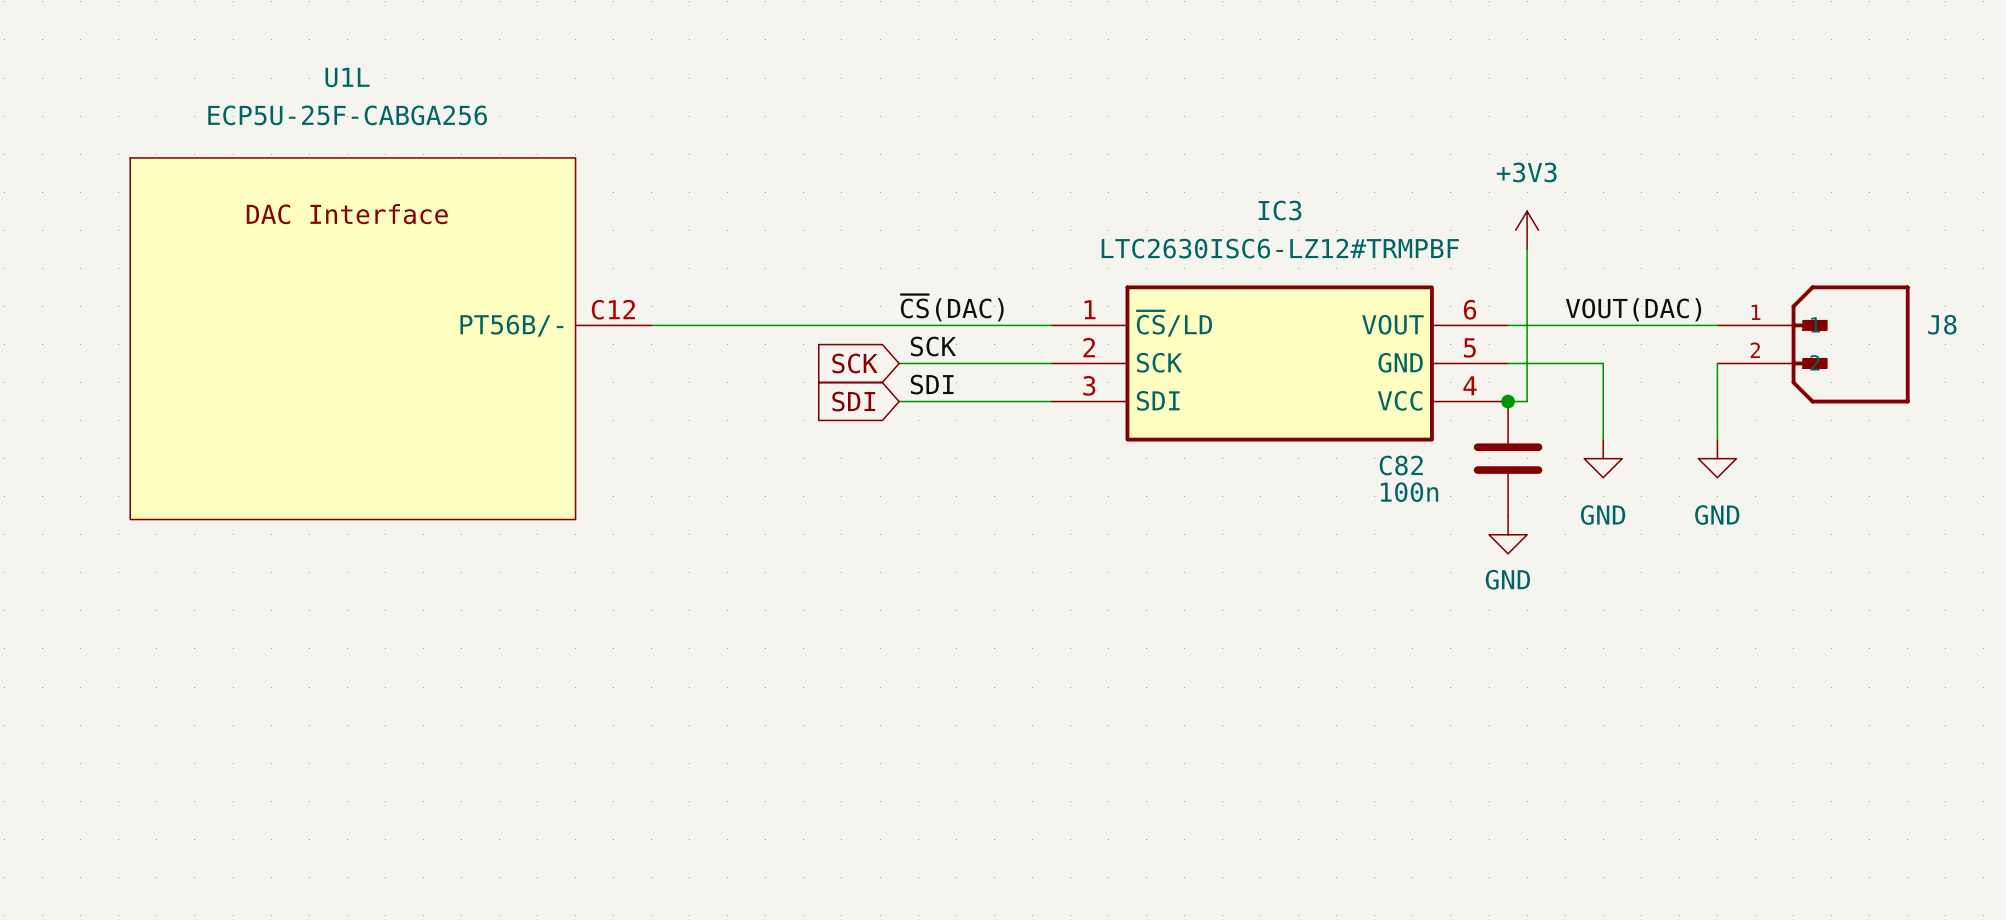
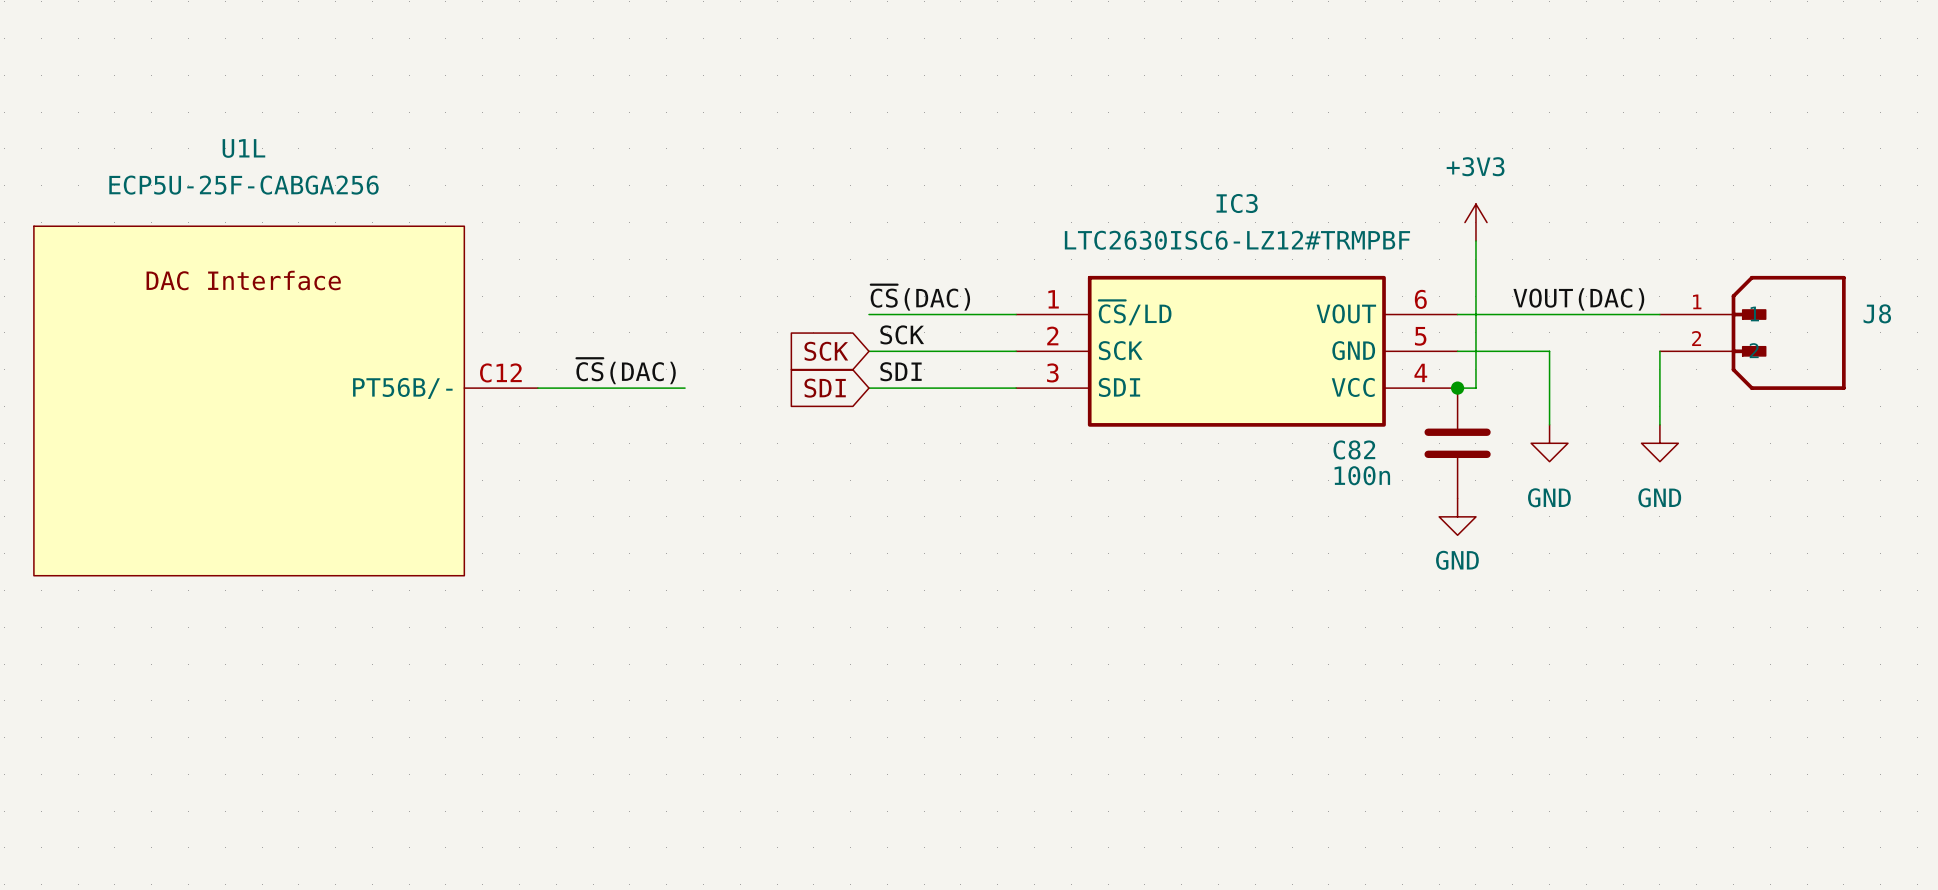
wire: (651, 325) (899, 325) -> none
label: none -> ~{CS}(DAC) (626, 371)
wire: none -> (537, 388) (685, 388)
U1L position: (425, 471) -> (319, 529)

